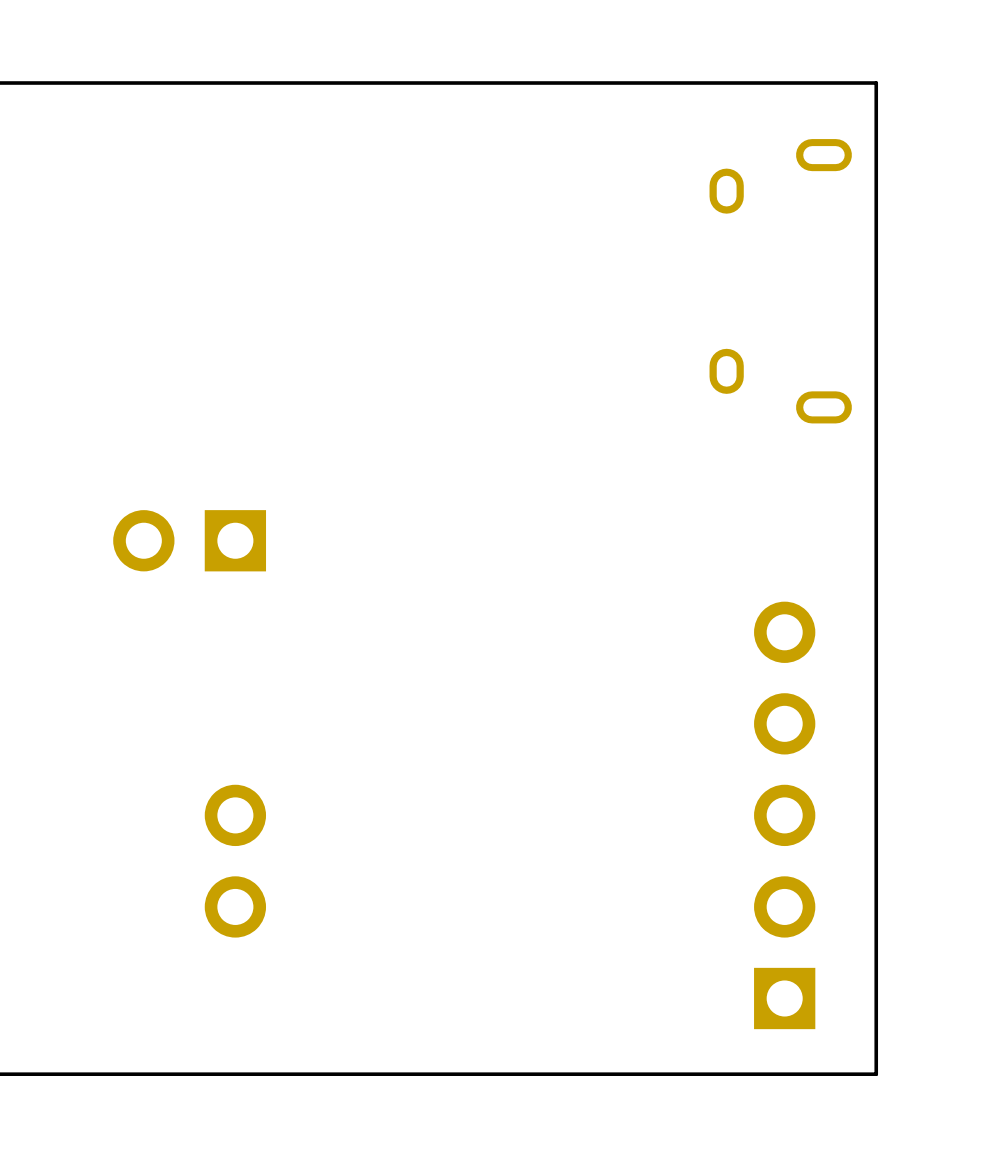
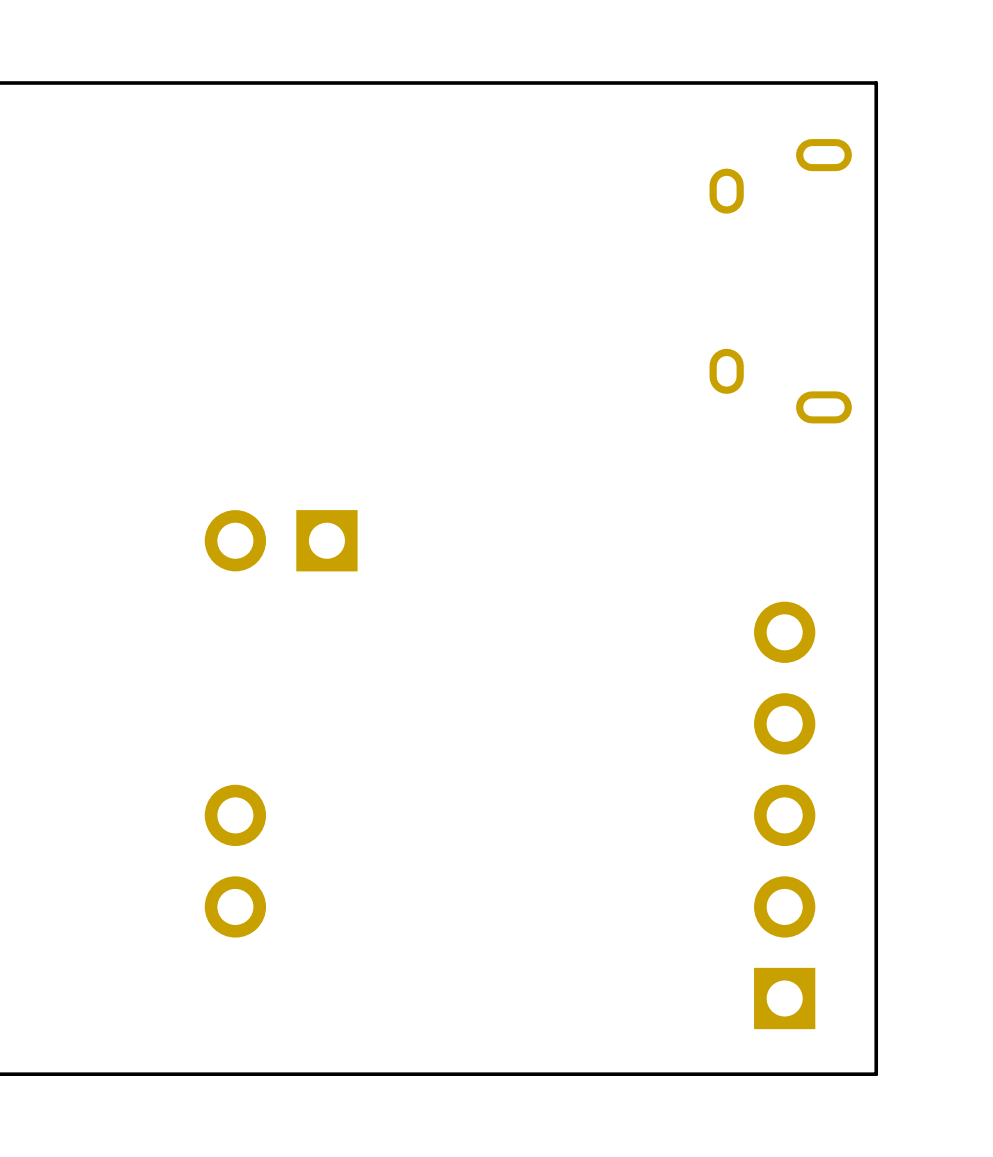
part position: (189, 540) -> (281, 540)

